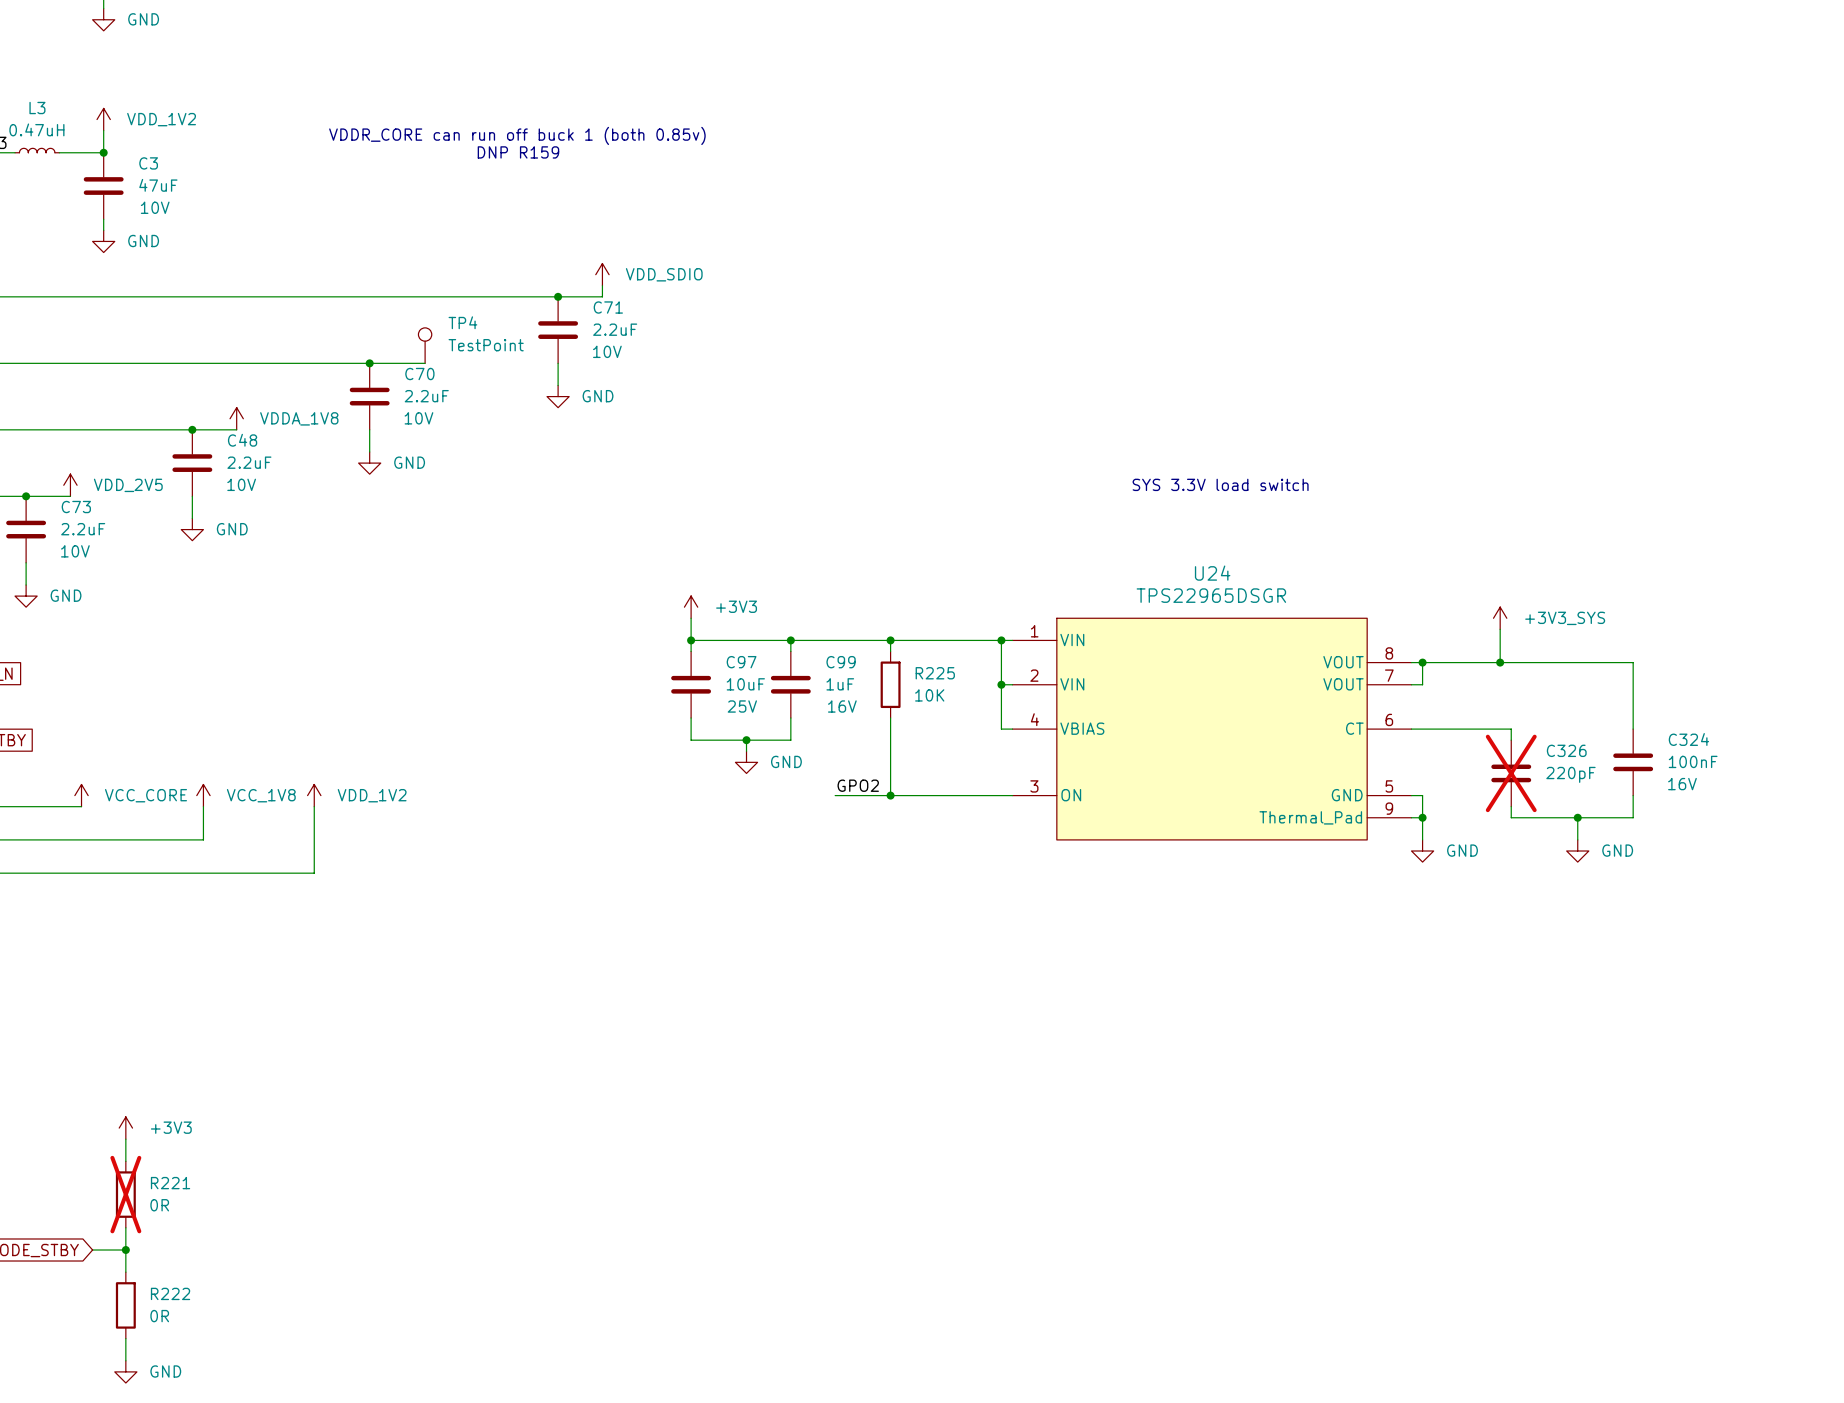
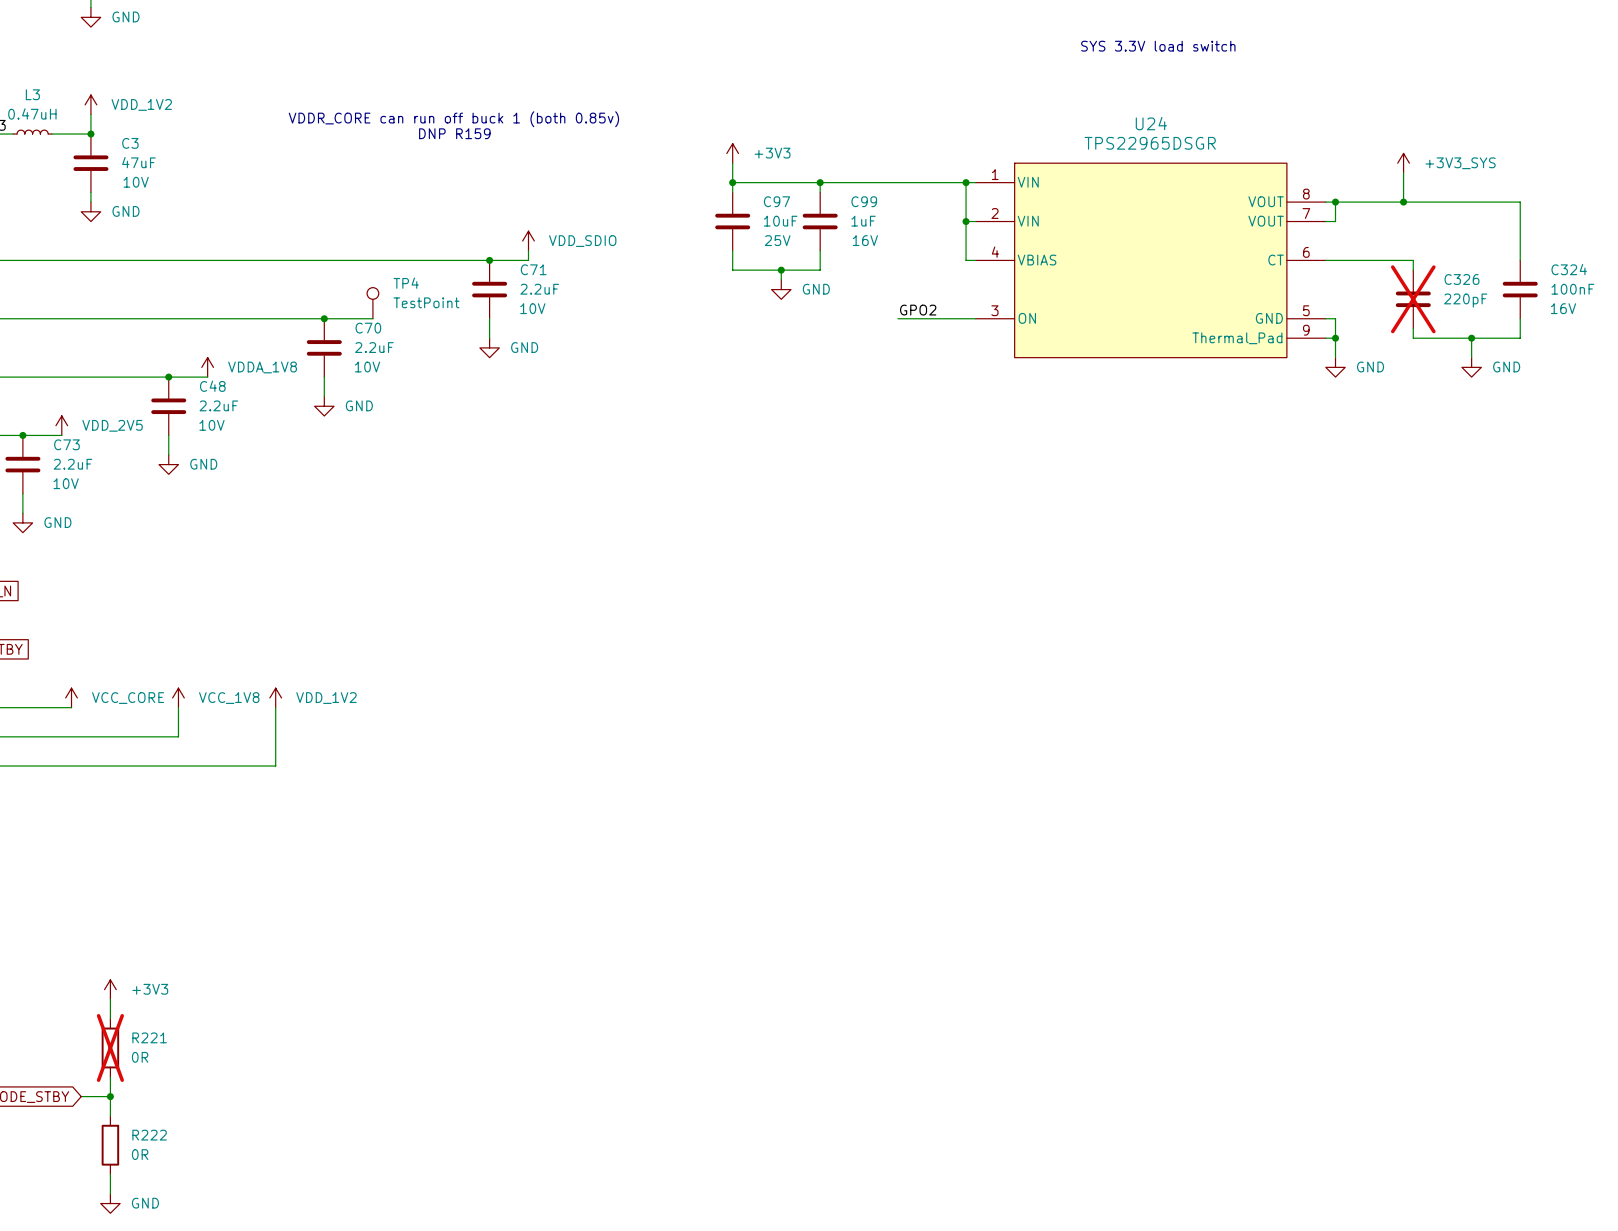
text: none -> SYS 3.3V load switch (1158, 46)
power symbol: none -> +3V3 (732, 153)
wire: none -> (732, 163) (732, 192)
power symbol: none -> +3V3_SYS (1403, 163)
wire: none -> (1403, 172) (1403, 202)
wire: none -> (732, 182) (975, 182)
junction: none -> (732, 182)
wire: none -> (820, 182) (820, 192)
junction: none -> (820, 182)
wire: none -> (966, 182) (966, 260) (975, 260)
junction: none -> (966, 182)
wire: none -> (1325, 202) (1520, 202) (1520, 260)
wire: none -> (1335, 202) (1335, 221) (1325, 221)
junction: none -> (1335, 202)
junction: none -> (1403, 202)
wire: none -> (966, 221) (975, 221)
junction: none -> (966, 221)
wire: none -> (732, 250) (732, 270) (820, 270) (820, 250)
wire: none -> (1325, 260) (1413, 260) (1413, 270)
wire: none -> (781, 270) (781, 279)
junction: none -> (781, 270)
power symbol: none -> GND (781, 289)
label: none -> GPO2 (918, 310)
wire: none -> (897, 318) (975, 318)
wire: none -> (1325, 318) (1335, 318) (1335, 357)
wire: none -> (1520, 318) (1520, 338) (1413, 338) (1413, 328)
wire: none -> (1325, 338) (1335, 338)
junction: none -> (1335, 338)
wire: none -> (1471, 338) (1471, 357)
junction: none -> (1471, 338)
power symbol: none -> GND (1335, 367)
power symbol: none -> GND (1471, 367)
text: SYS 3.3V load switch (1220, 484) -> none
power symbol: +3V3 (691, 607) -> none
wire: (691, 618) (691, 651) -> none
power symbol: +3V3_SYS (1500, 618) -> none
wire: (1500, 629) (1500, 662) -> none
wire: (691, 640) (1012, 640) -> none
junction: (691, 640) -> none
wire: (790, 640) (790, 651) -> none
junction: (790, 640) -> none
wire: (890, 640) (890, 651) -> none
junction: (890, 640) -> none
wire: (1001, 640) (1001, 729) (1012, 729) -> none
junction: (1001, 640) -> none
wire: (1411, 662) (1633, 662) (1633, 729) -> none
wire: (1422, 662) (1422, 684) (1411, 684) -> none
junction: (1422, 662) -> none
junction: (1500, 662) -> none
C97 position: (691, 684) -> (732, 221)
C99 position: (790, 684) -> (820, 221)
R225: 10K (890, 684) -> none
wire: (1001, 684) (1012, 684) -> none
junction: (1001, 684) -> none
wire: (691, 718) (691, 740) (790, 740) (790, 718) -> none
wire: (890, 718) (890, 795) -> none
U24 position: (1212, 729) -> (1150, 260)
wire: (1411, 729) (1511, 729) (1511, 740) -> none
wire: (746, 740) (746, 751) -> none
junction: (746, 740) -> none
power symbol: GND (746, 762) -> none
C324 position: (1633, 762) -> (1520, 289)
C326 position: (1511, 773) -> (1413, 299)
label: GPO2 (858, 785) -> none
wire: (835, 795) (1012, 795) -> none
junction: (890, 795) -> none
wire: (1411, 795) (1422, 795) (1422, 839) -> none
wire: (1633, 795) (1633, 817) (1511, 817) (1511, 806) -> none
wire: (1411, 817) (1422, 817) -> none
junction: (1422, 817) -> none
wire: (1577, 817) (1577, 839) -> none
junction: (1577, 817) -> none
power symbol: GND (1422, 851) -> none
power symbol: GND (1577, 851) -> none

